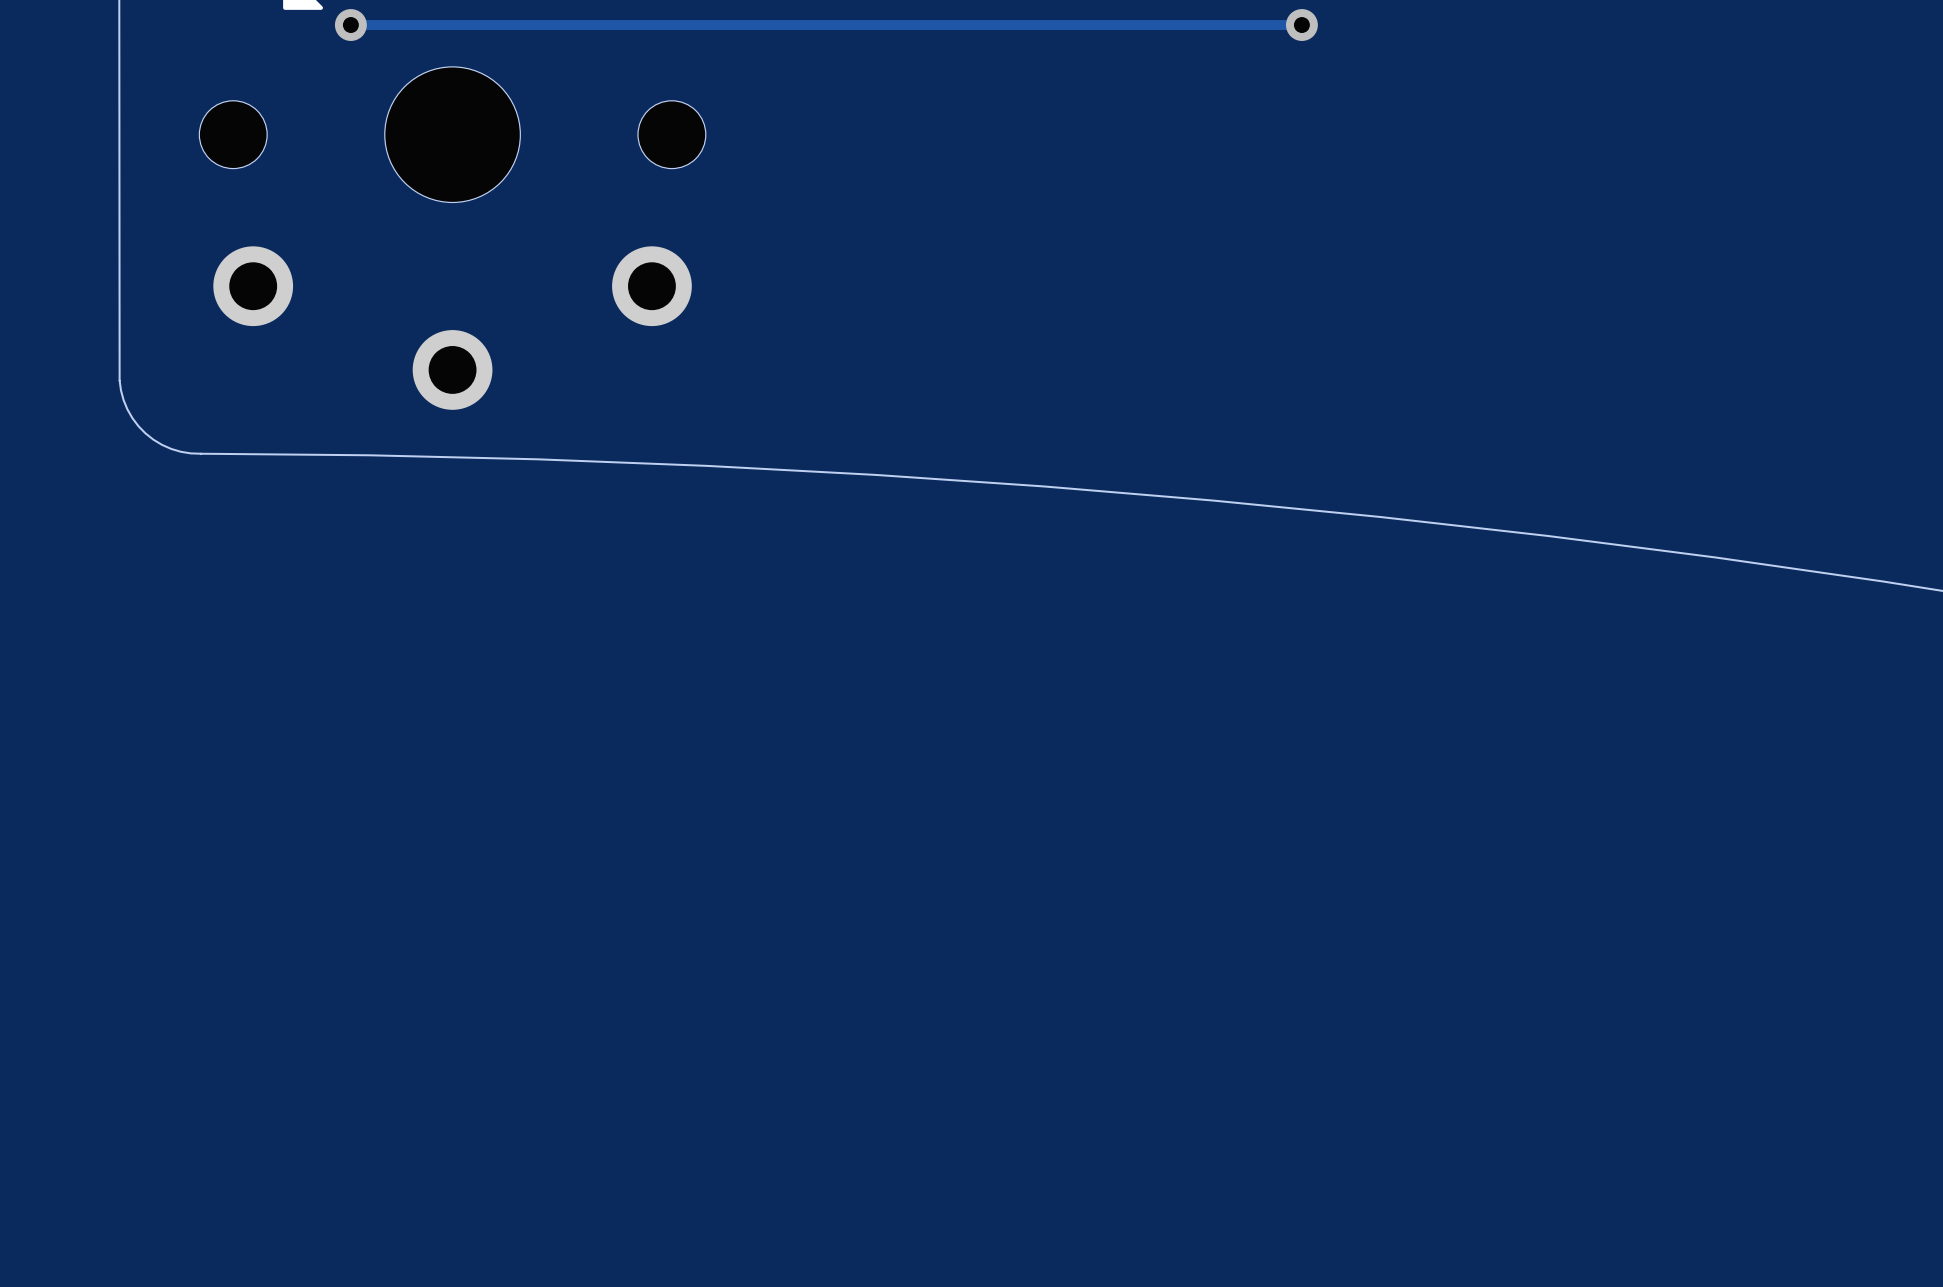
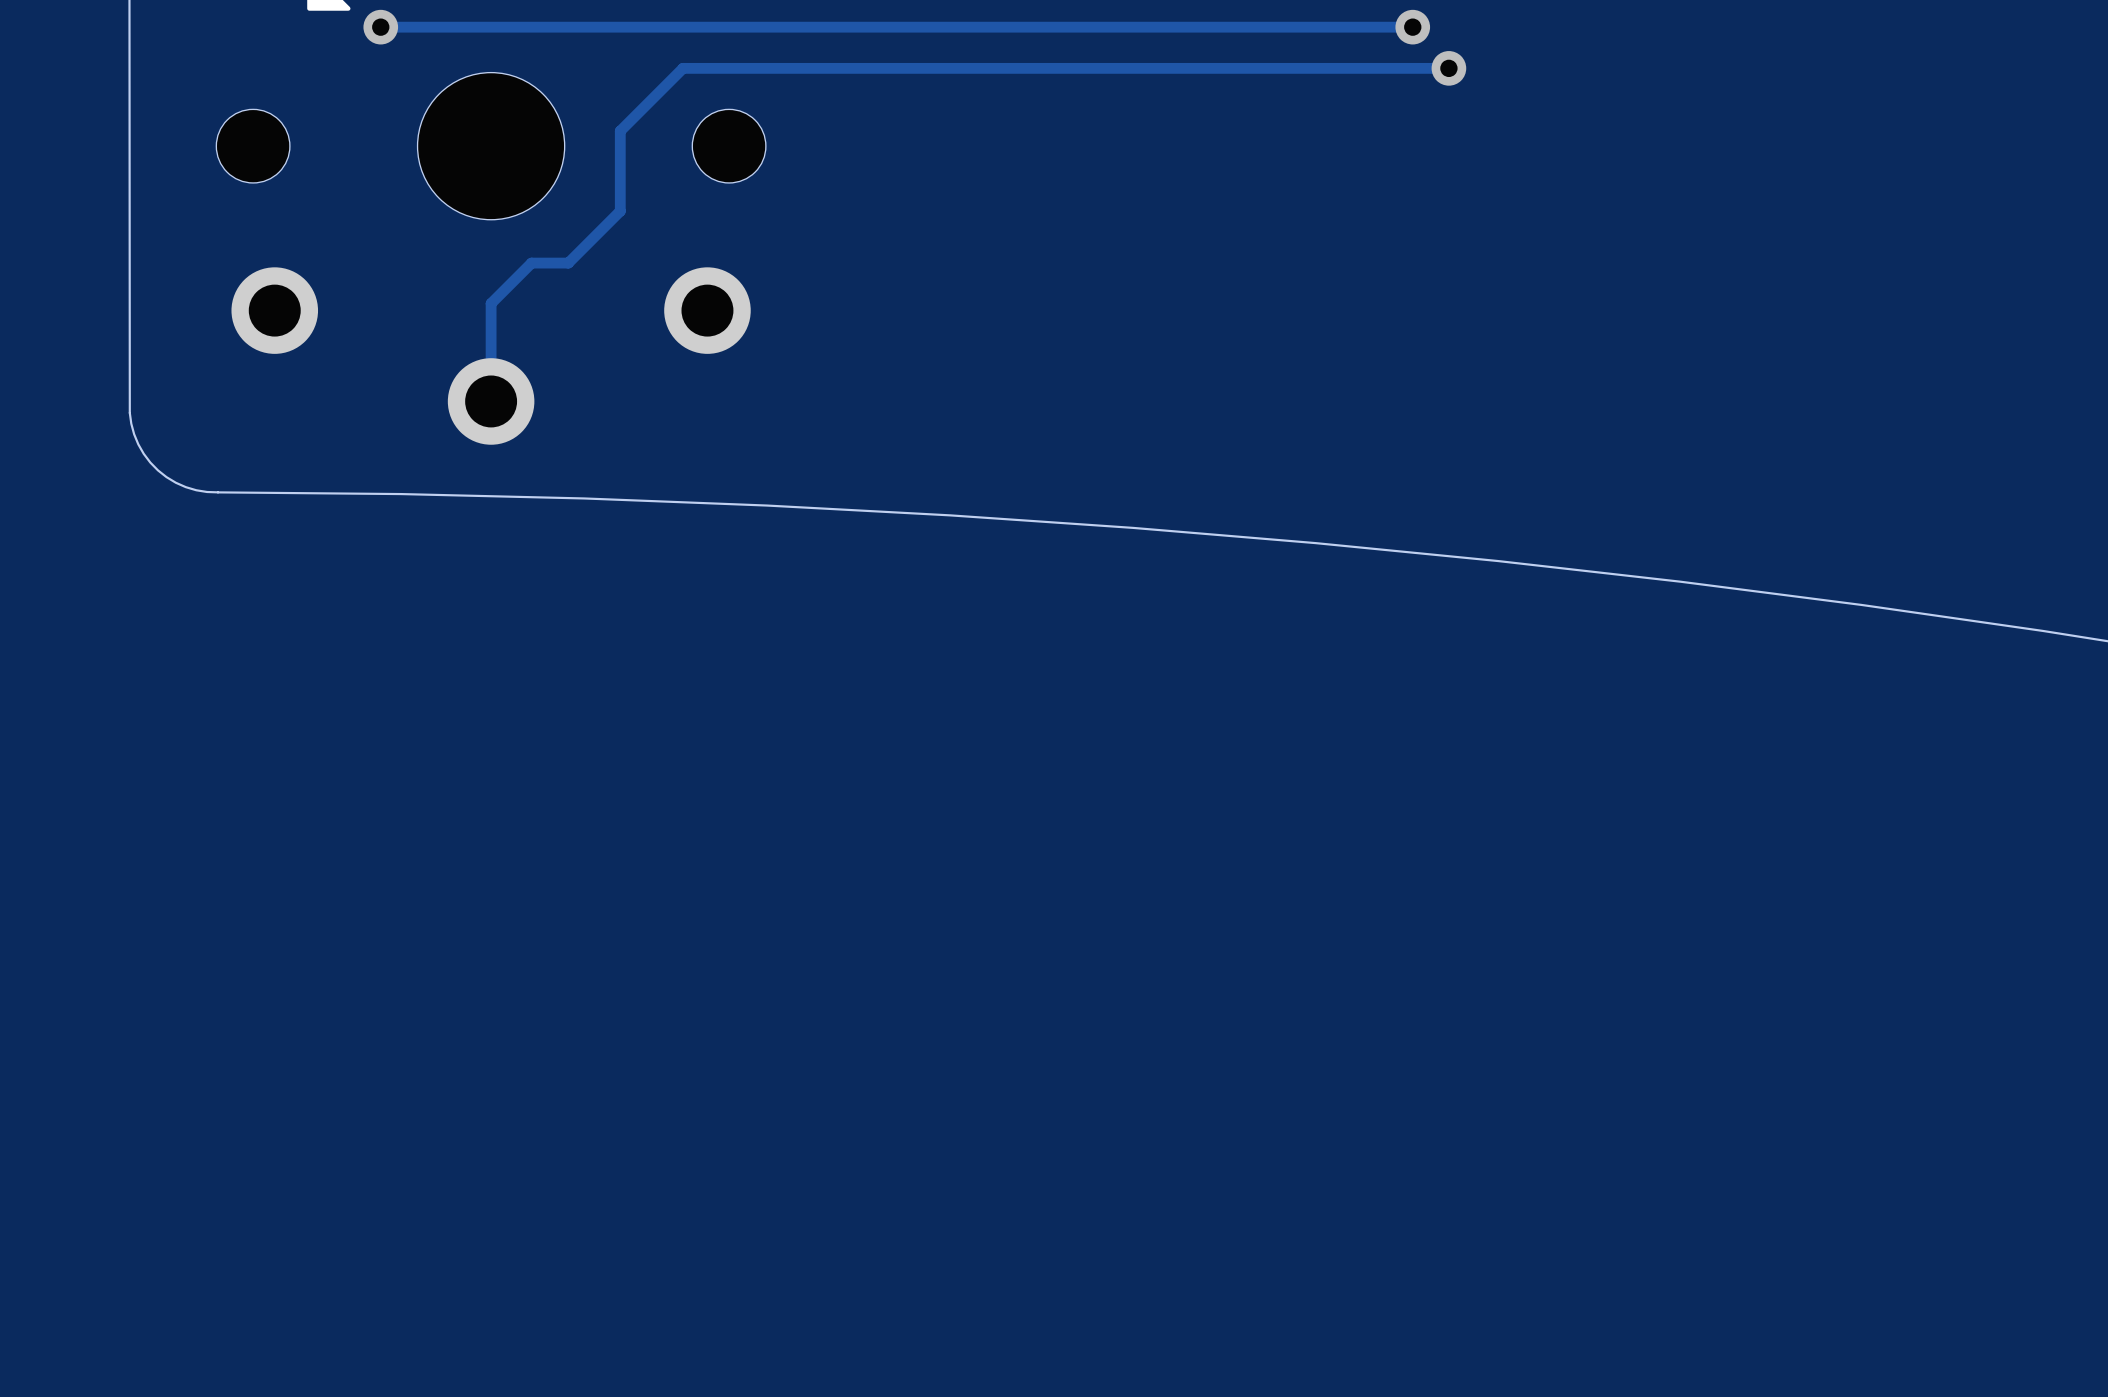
track: none -> (1448, 68) (683, 68) (620, 131) (620, 211) (568, 263) (531, 263) (491, 303) (491, 401)
via: none -> (1448, 68)

